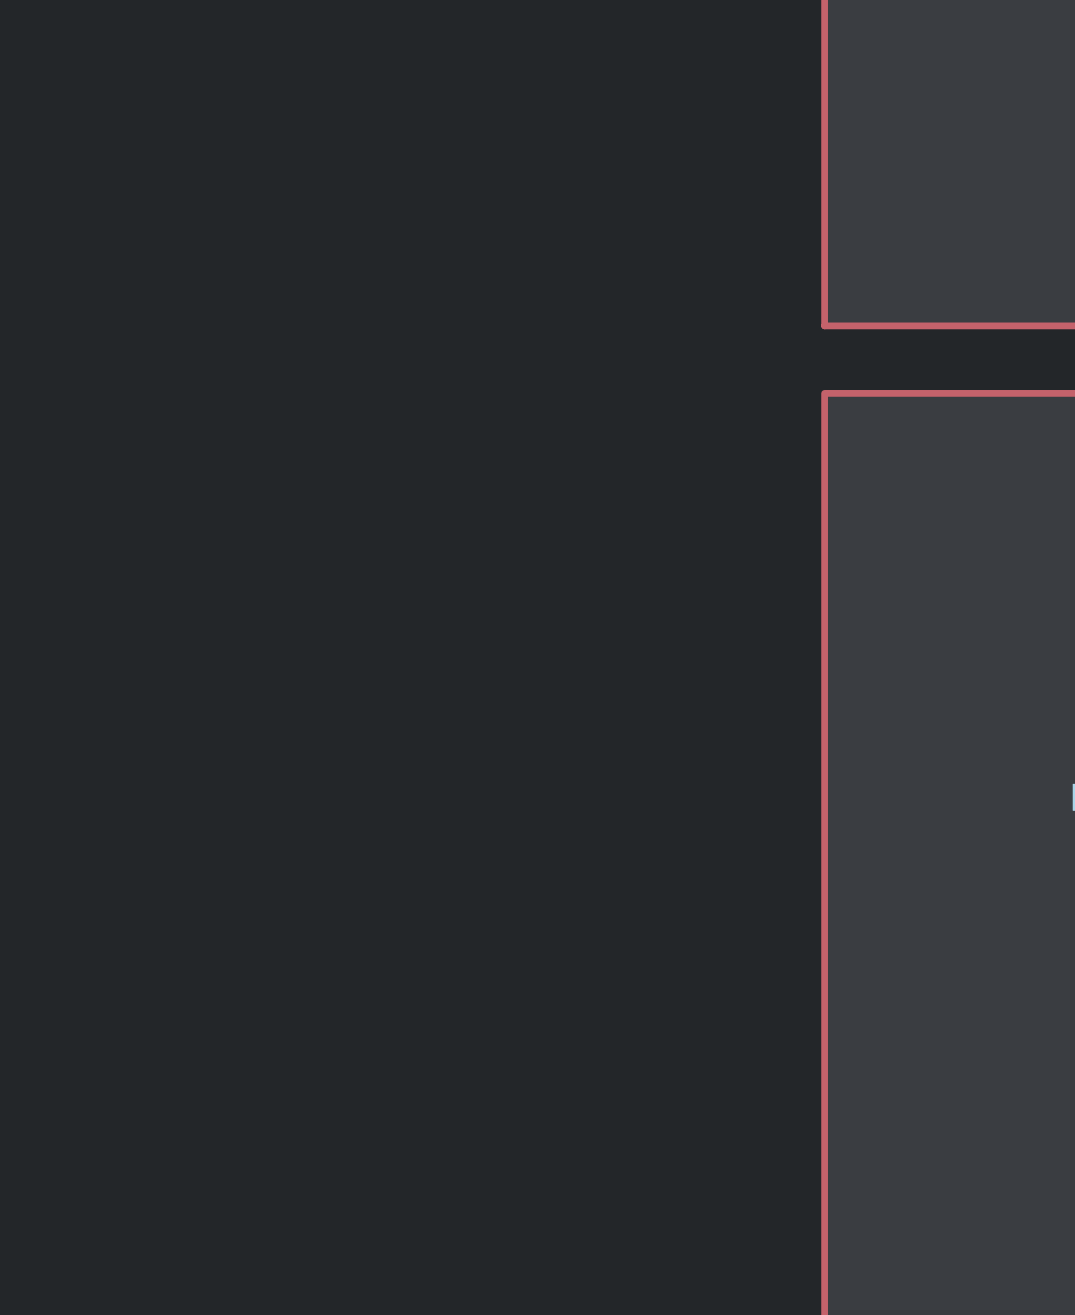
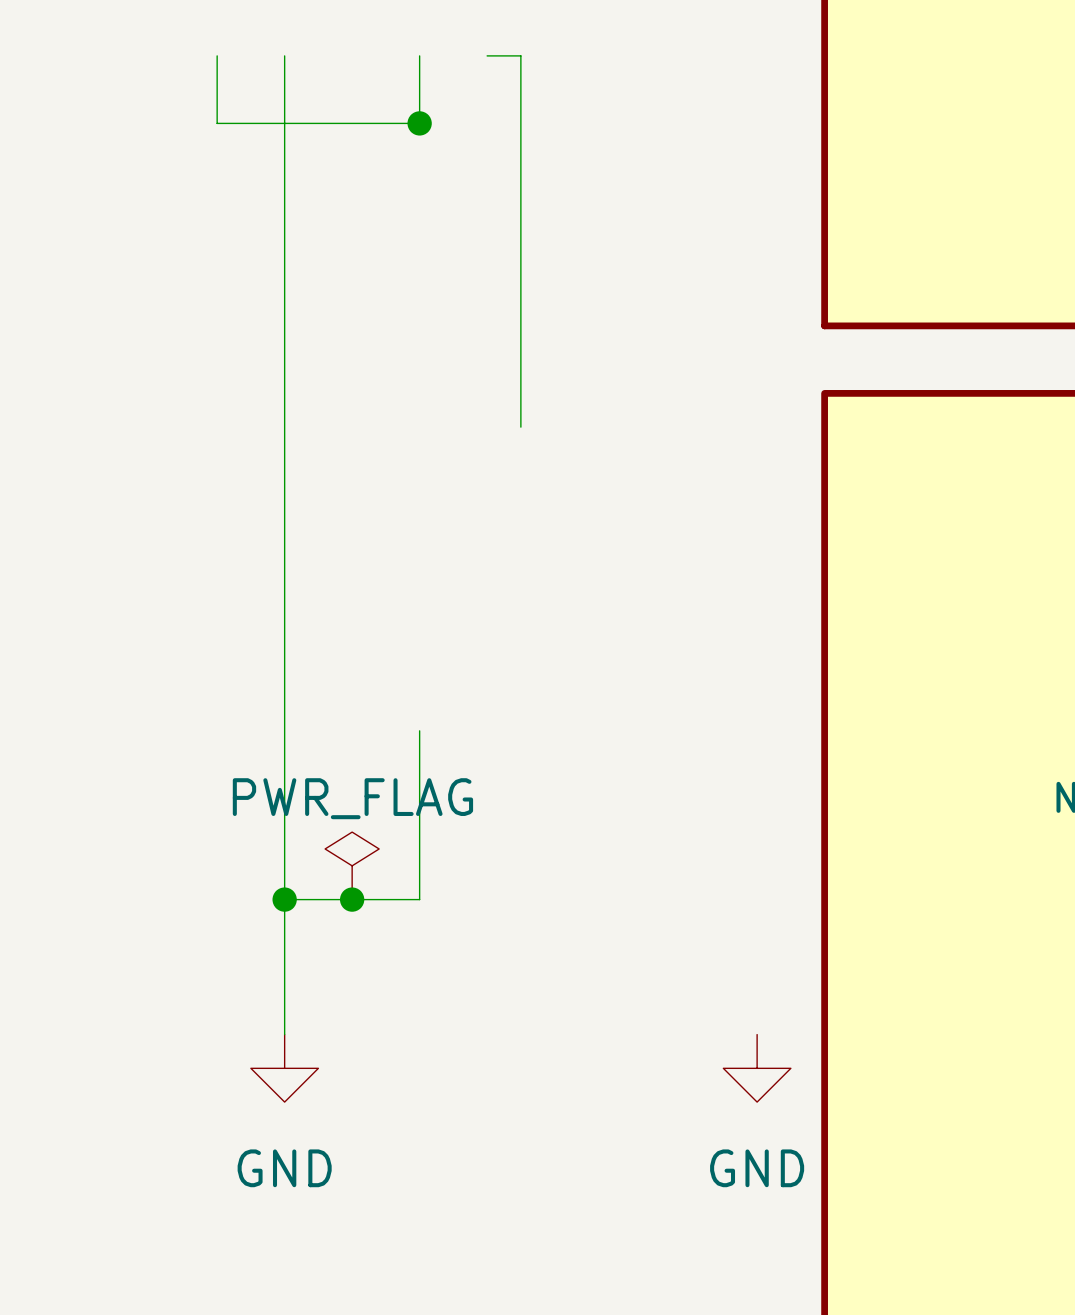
wire: none -> (217, 55) (217, 123) (419, 123) (419, 55)
wire: none -> (284, 55) (284, 1034)
wire: none -> (487, 55) (520, 55) (520, 427)
junction: none -> (419, 123)
wire: none -> (419, 730) (419, 899) (284, 899)
power symbol: none -> PWR_FLAG (352, 865)
junction: none -> (284, 899)
junction: none -> (352, 899)
power symbol: none -> GND (284, 1068)
power symbol: none -> GND (757, 1068)

